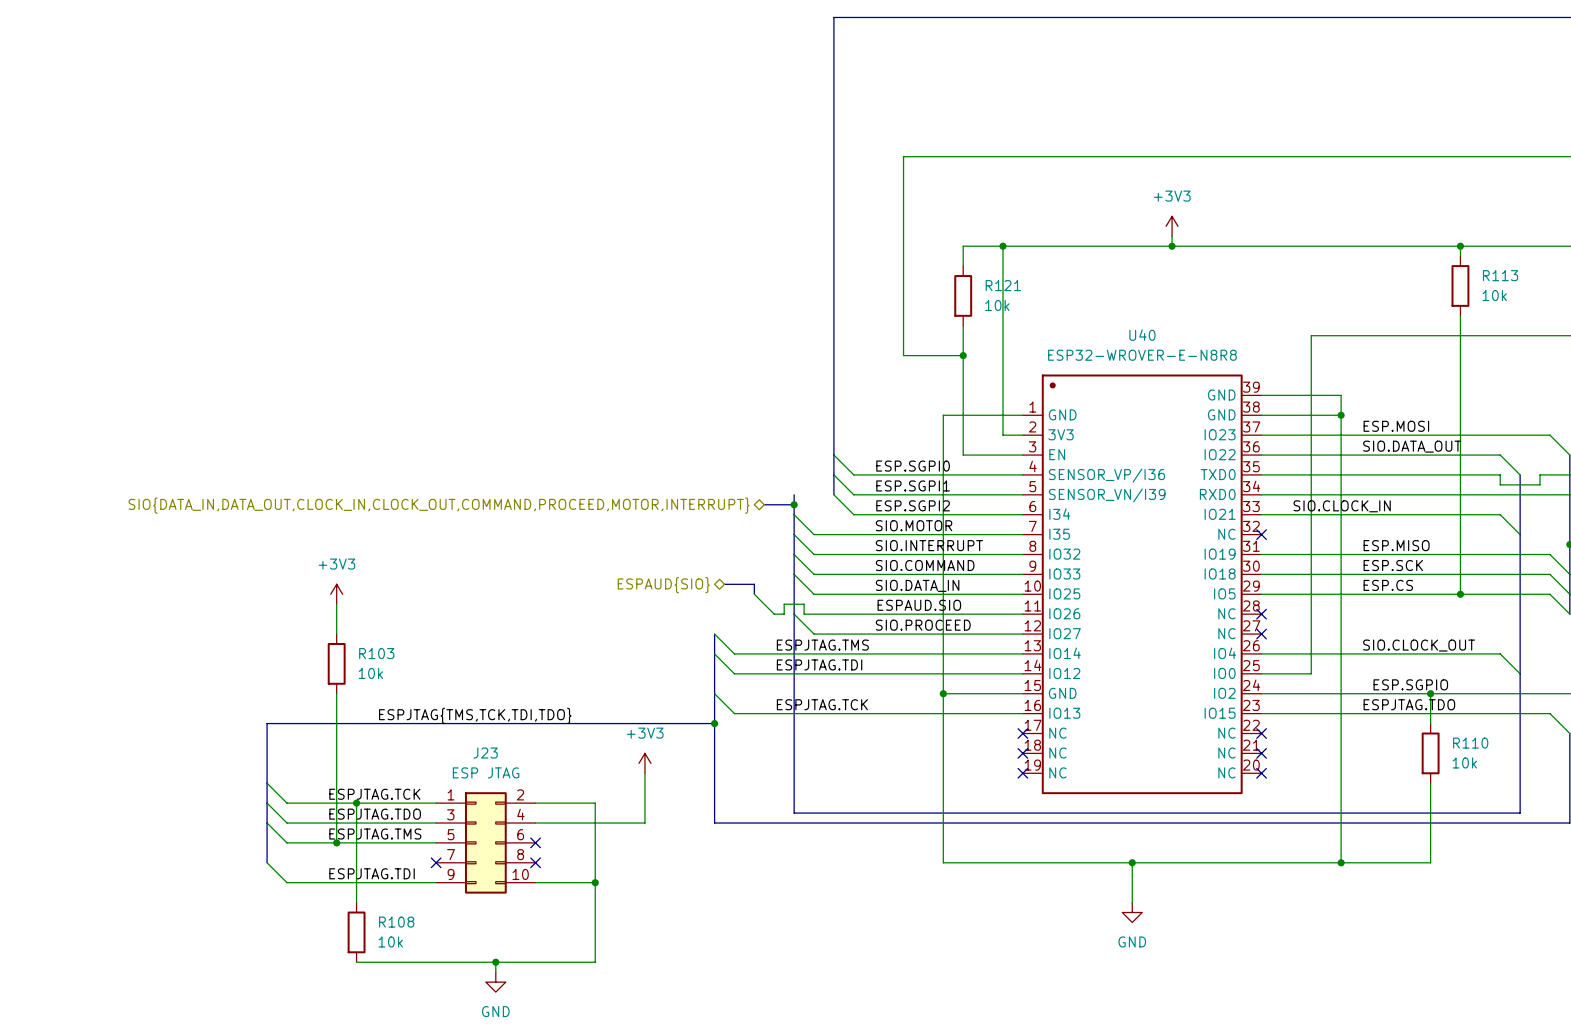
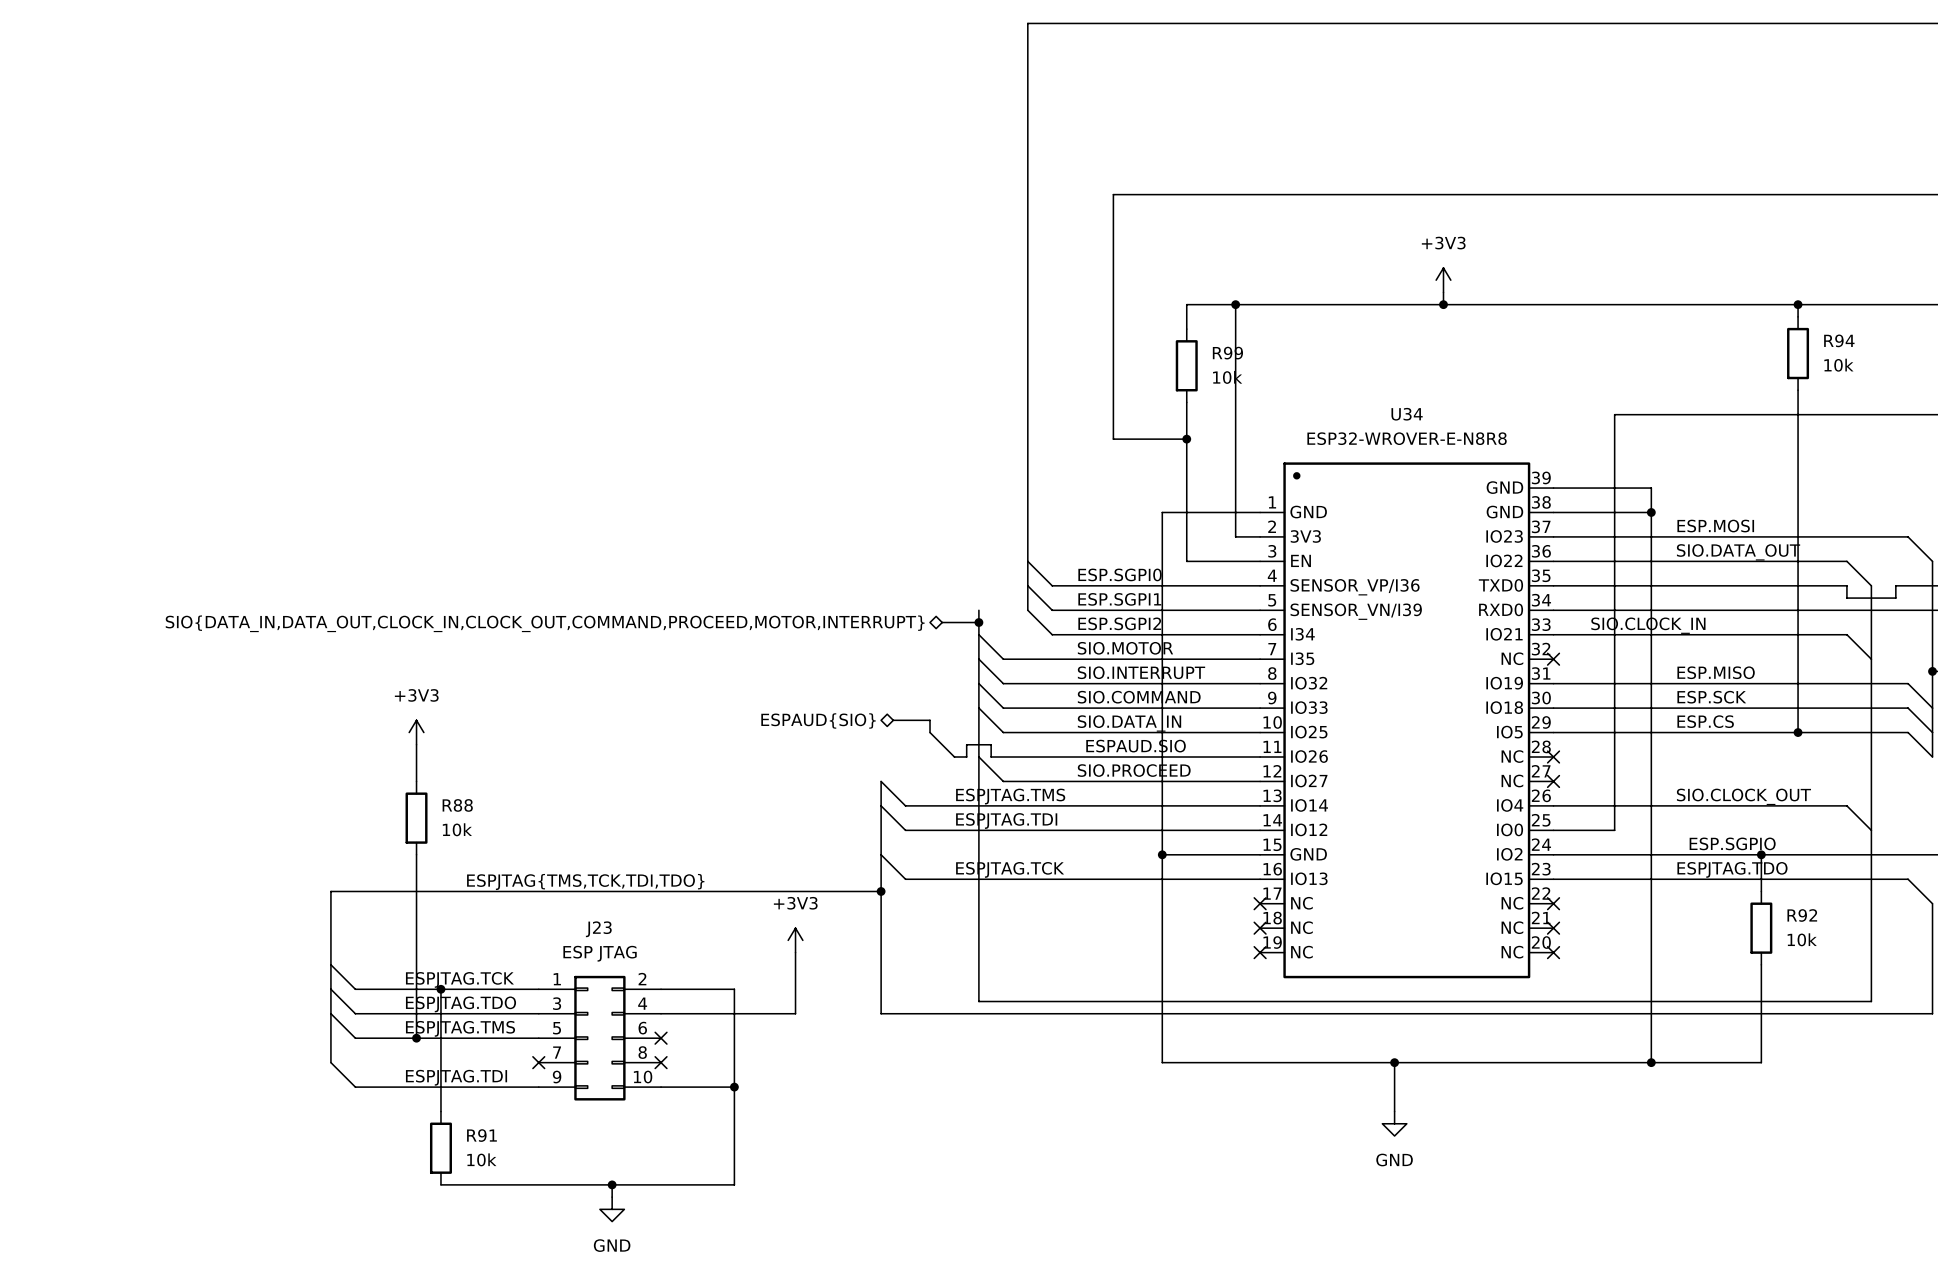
R113 name: R113 (1500, 275) -> R94 (1839, 340)
R121 name: R121 (1003, 285) -> R99 (1227, 353)
U40 name: U40 (1142, 335) -> U34 (1407, 414)
R103 name: R103 (376, 653) -> R88 (457, 805)
R110 name: R110 (1470, 743) -> R92 (1802, 915)
R108 name: R108 (396, 922) -> R91 (481, 1135)

